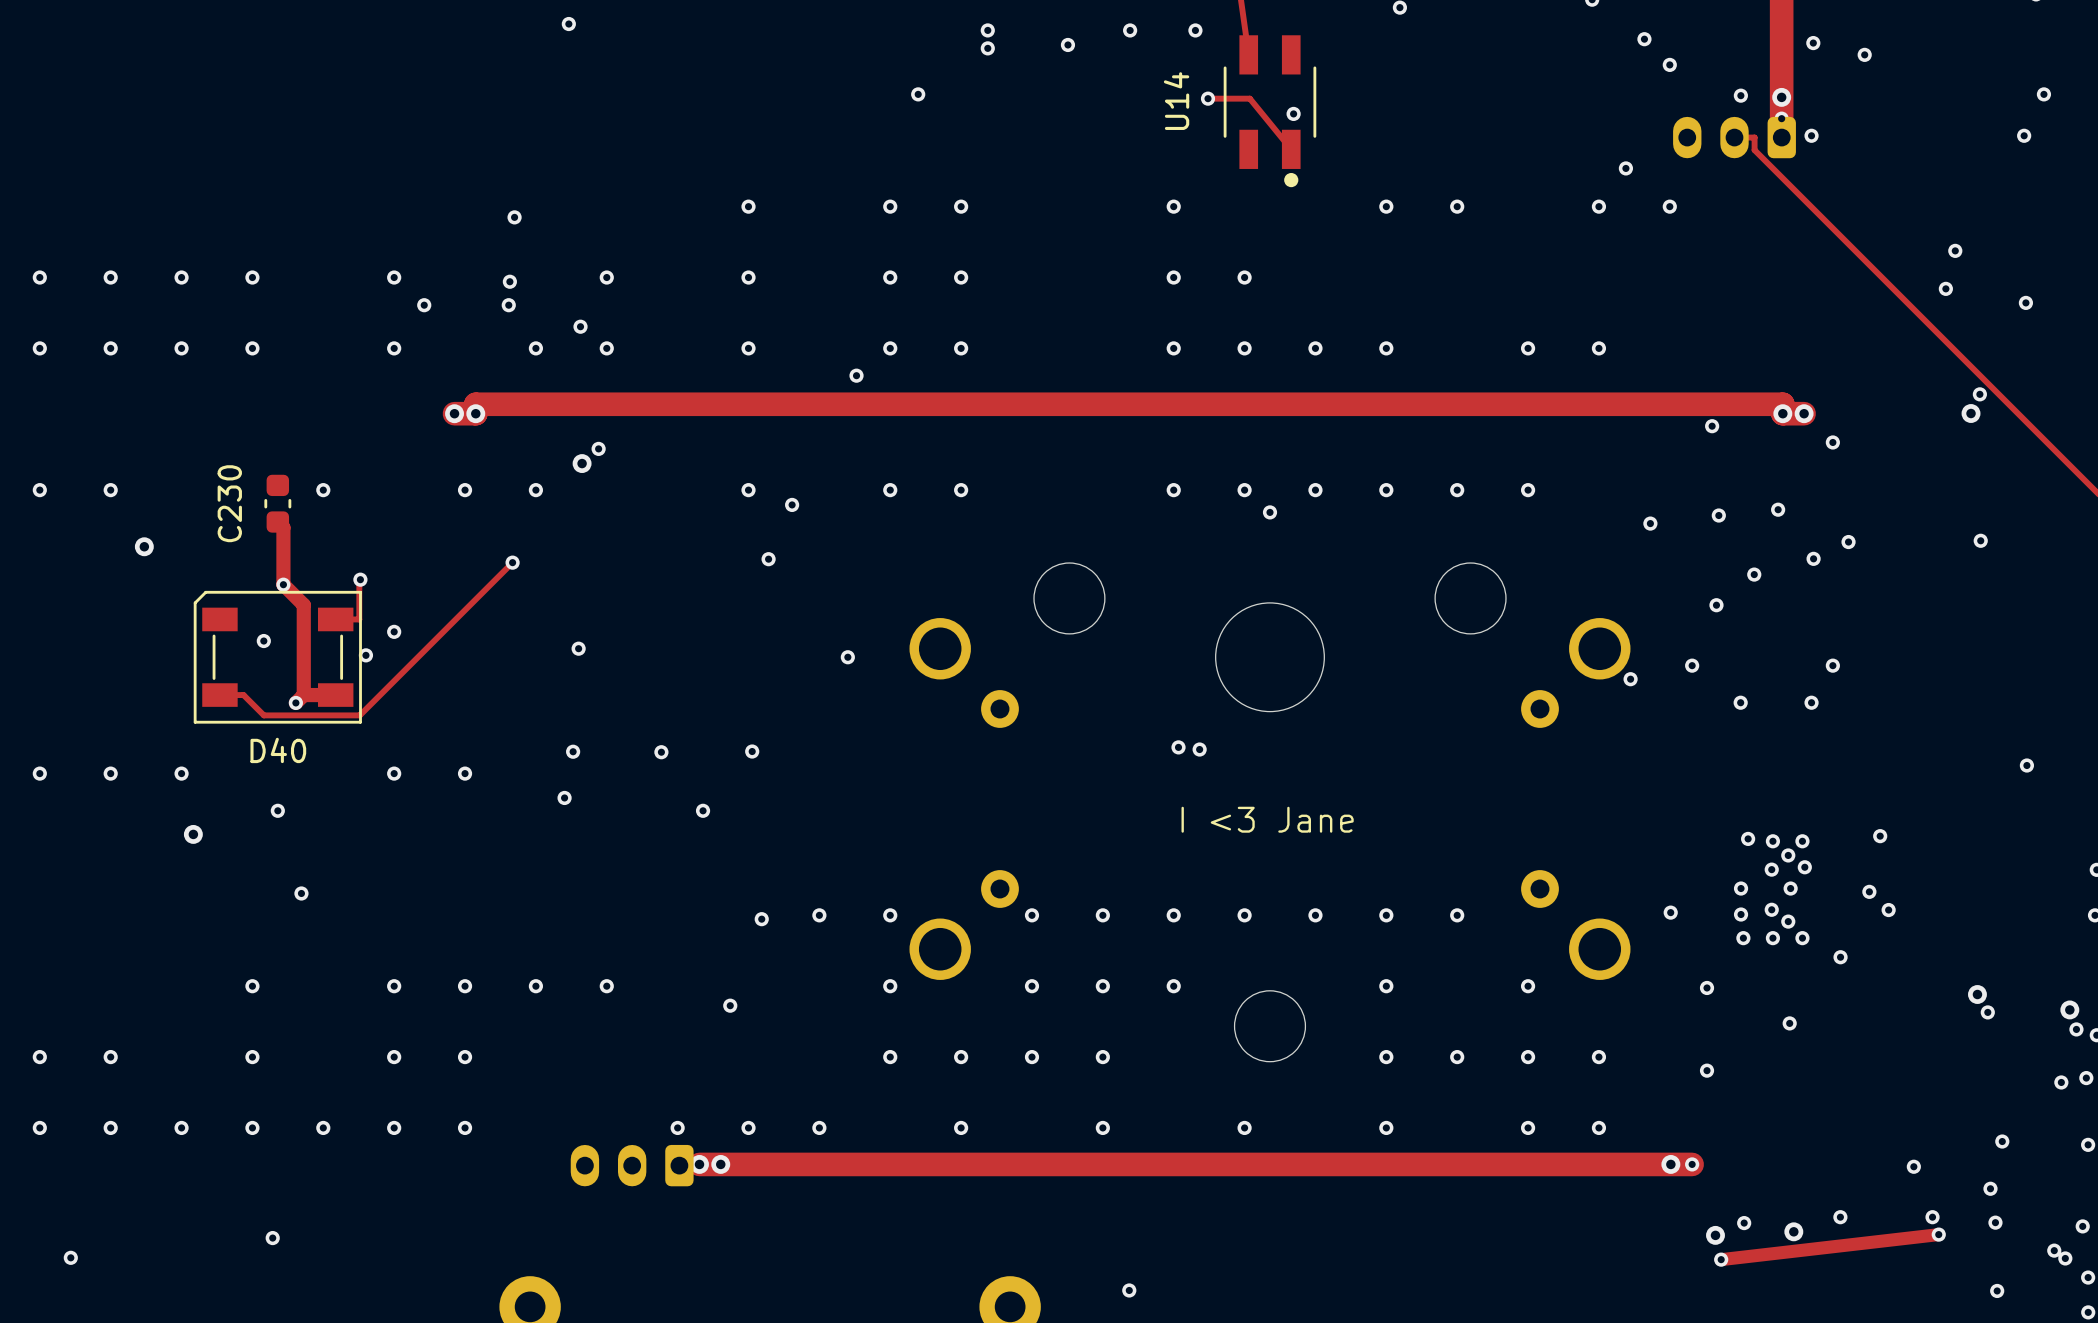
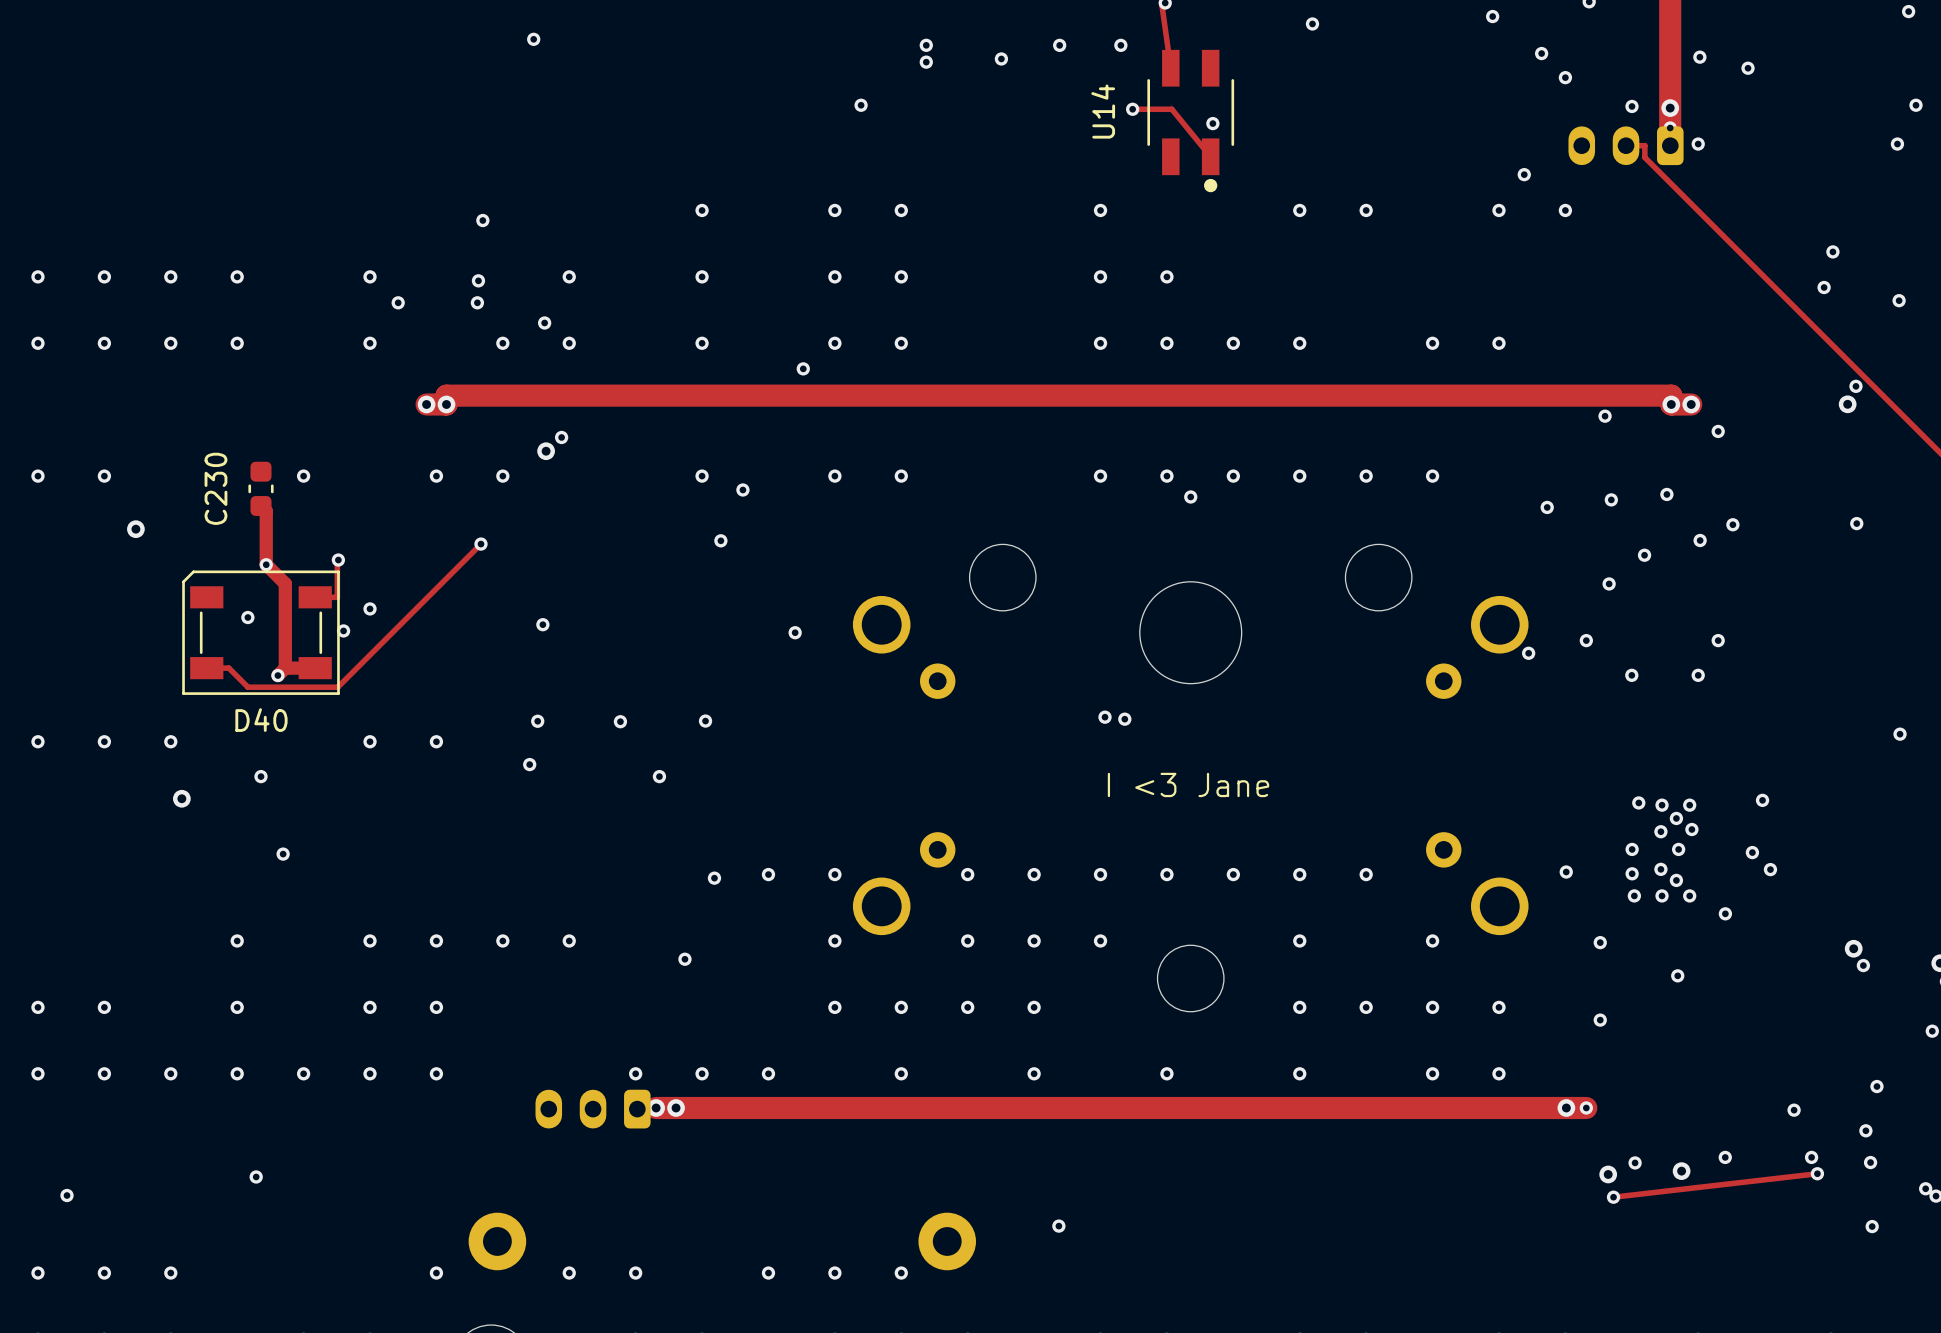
track width: thick (1938, 1234) (1721, 1259) -> thin (1817, 1173) (1613, 1197)

